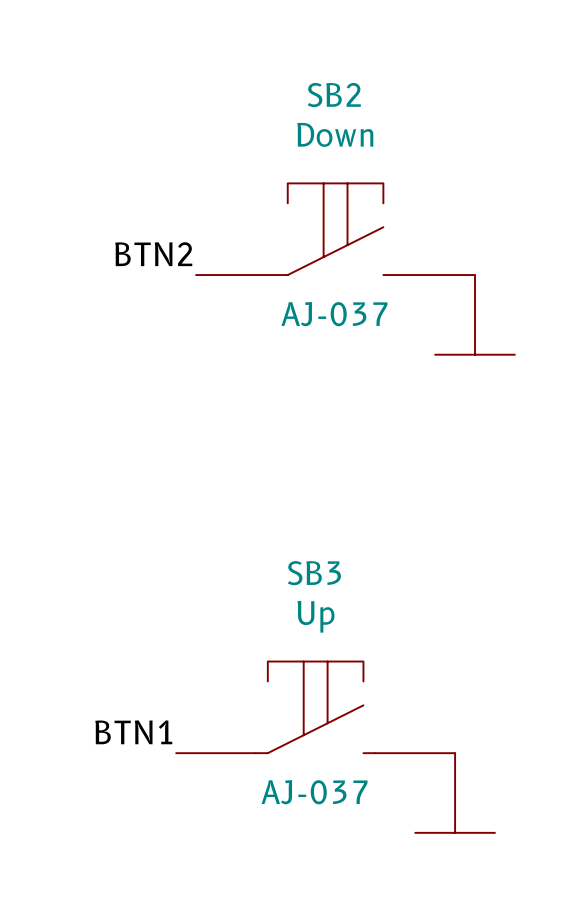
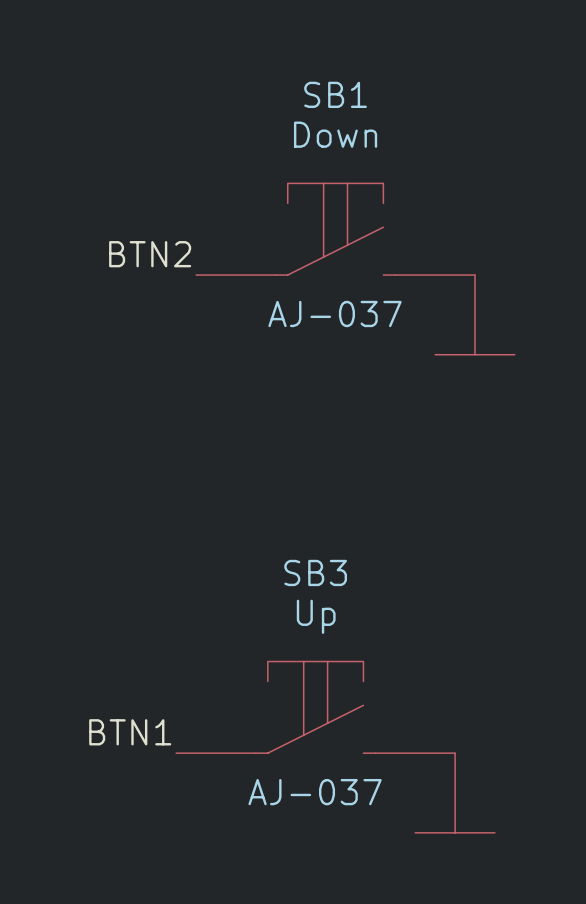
SB2 name: SB2 (334, 95) -> SB1 (335, 94)

